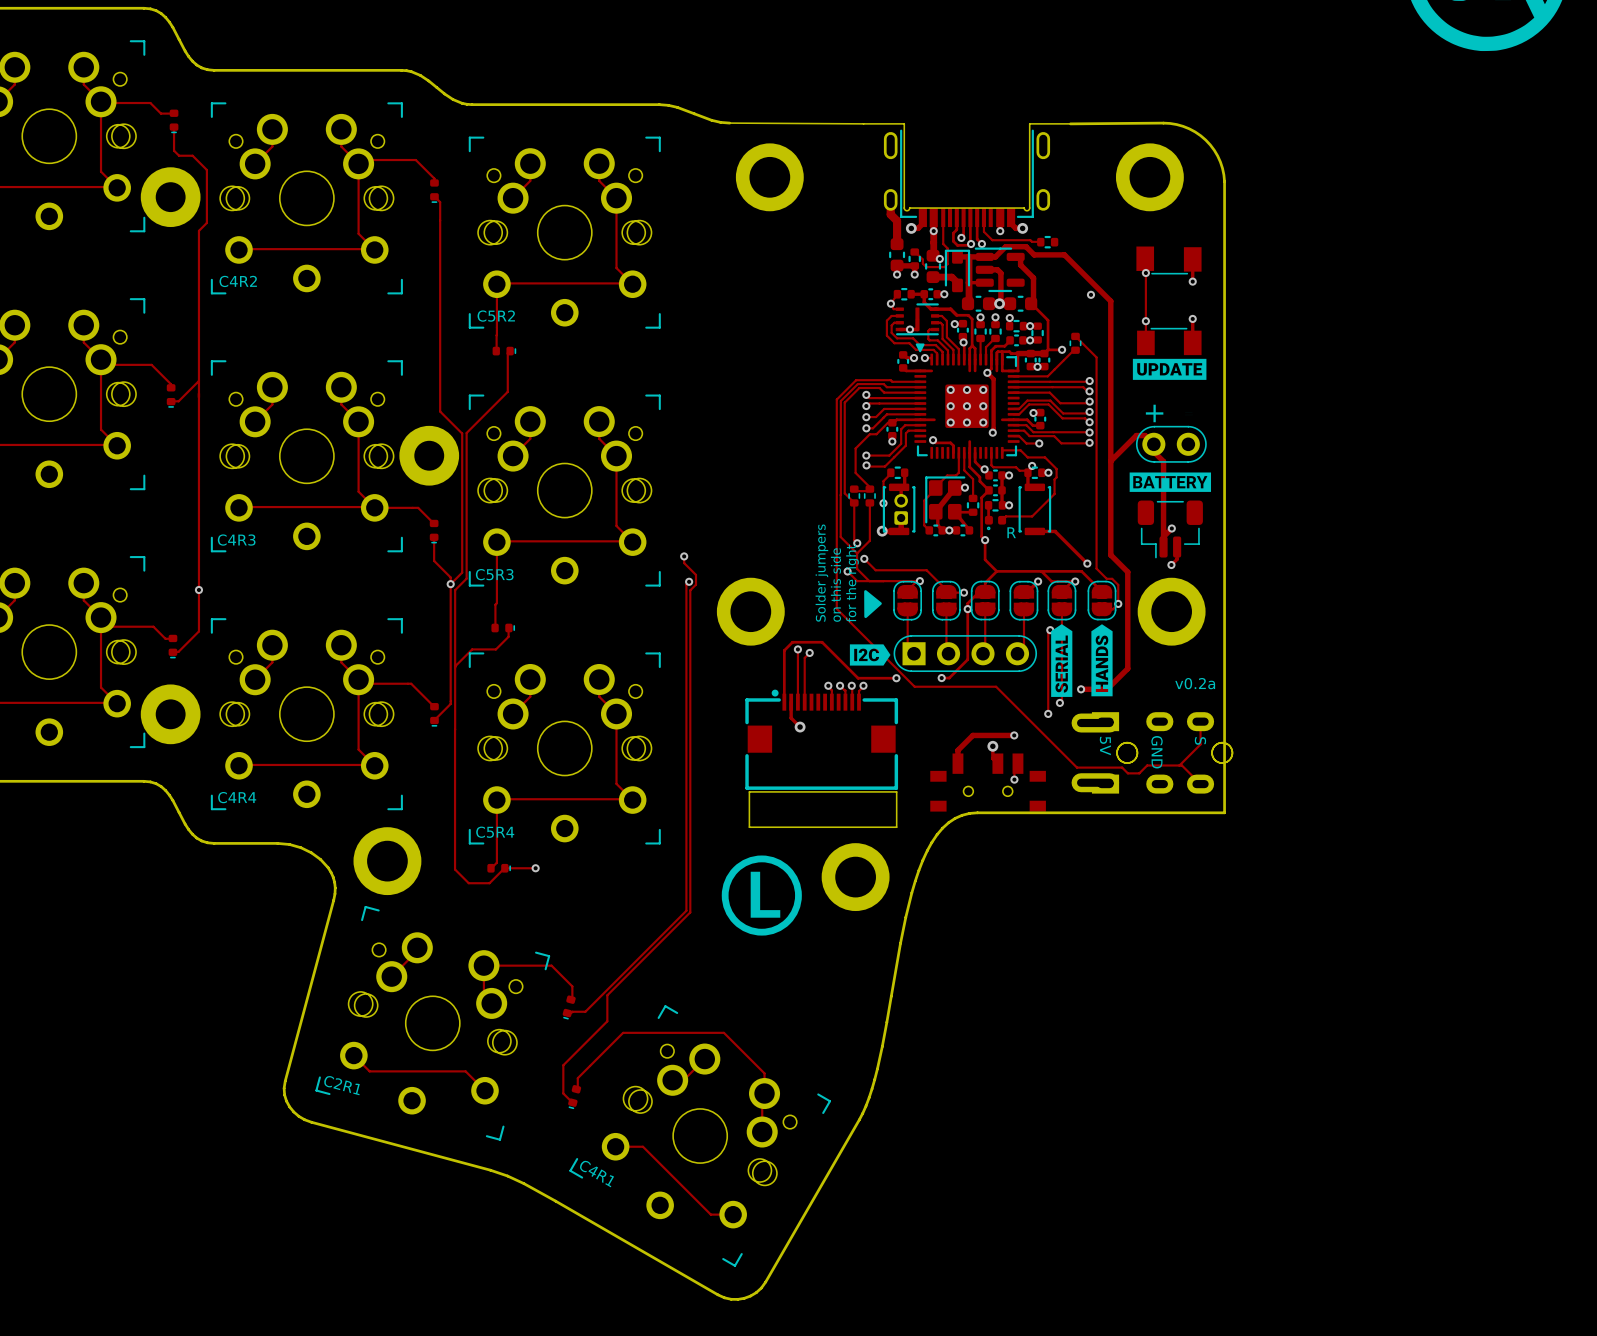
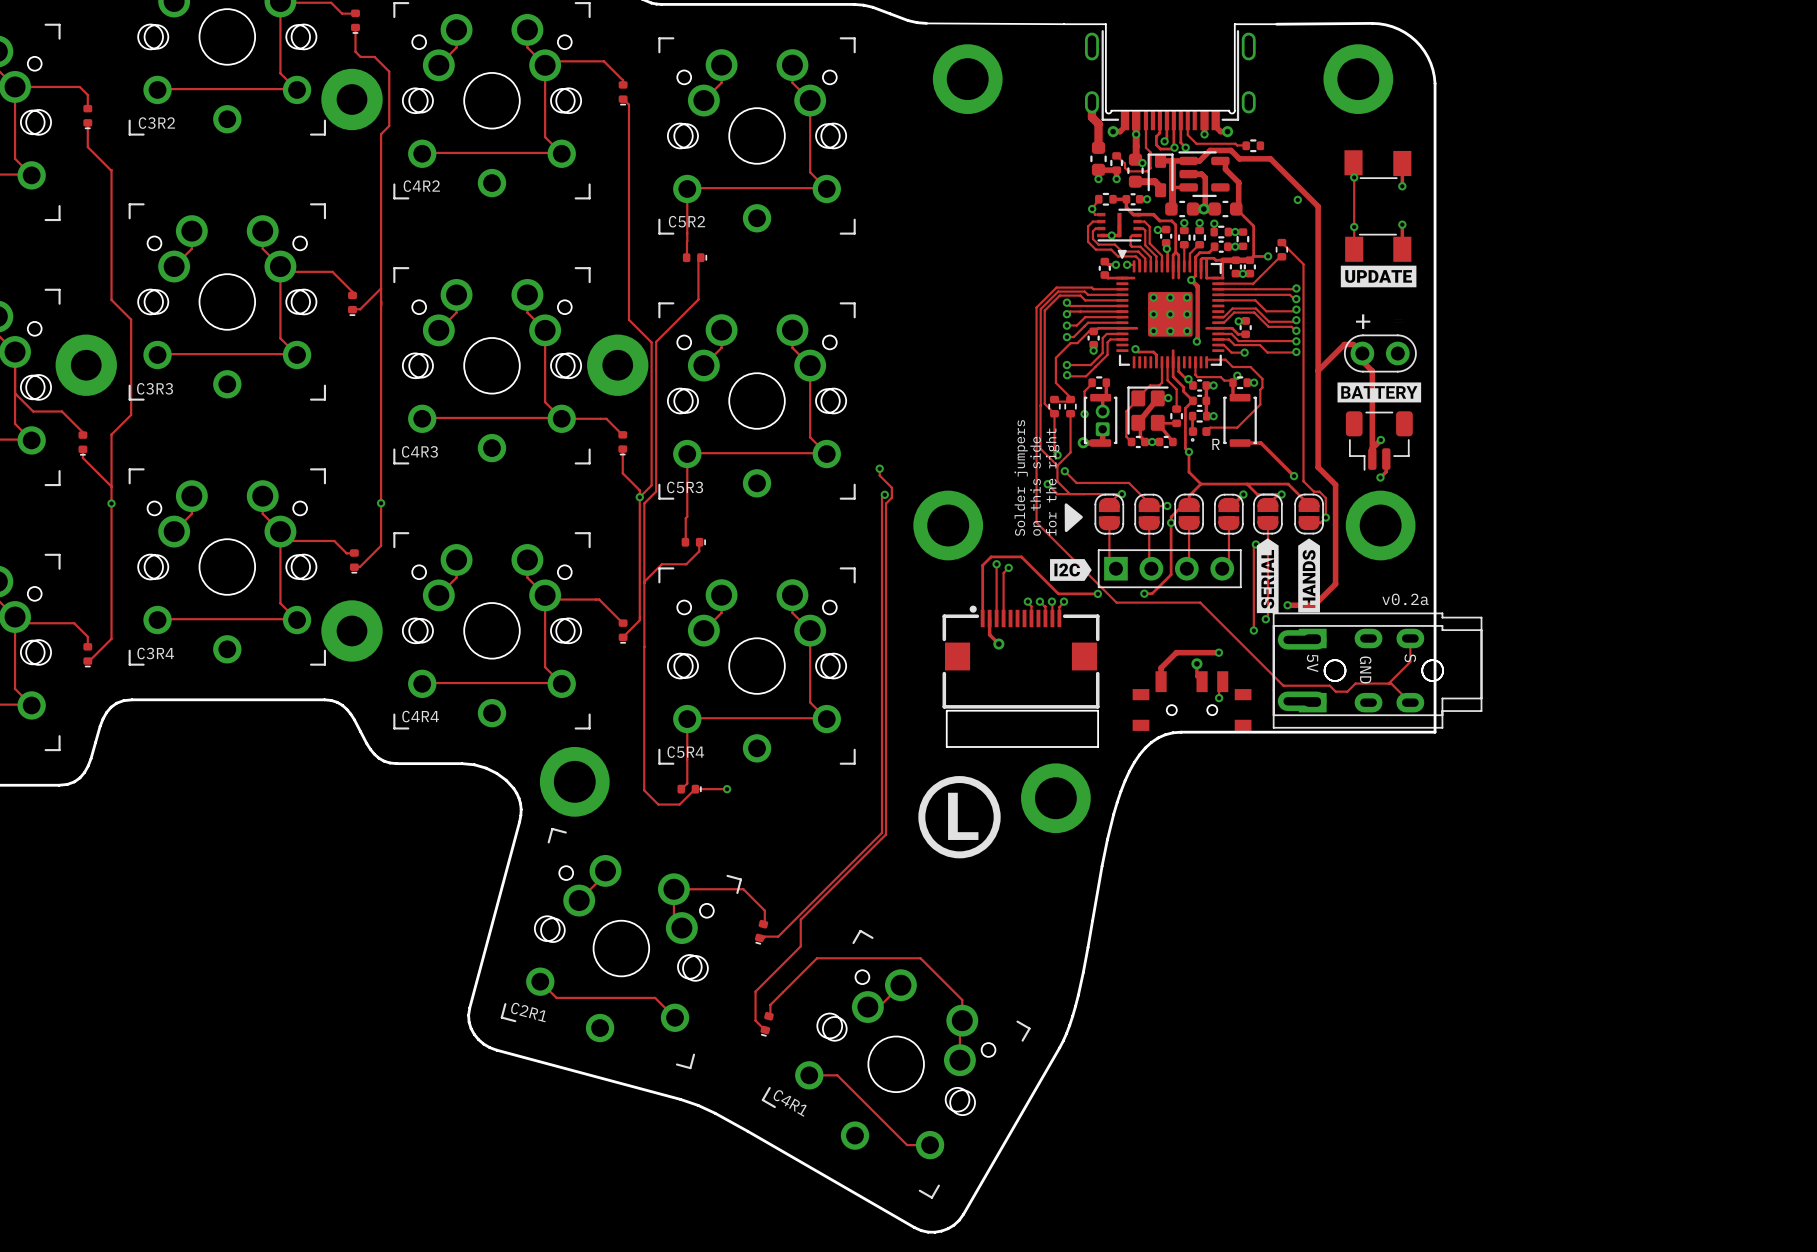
part footprint: [893, 635, 1038, 673] -> [1097, 549, 1242, 589]
part: (1152, 737) -> none
part: none -> (1377, 664)
part: none -> (1377, 676)
part: (1152, 768) -> none

